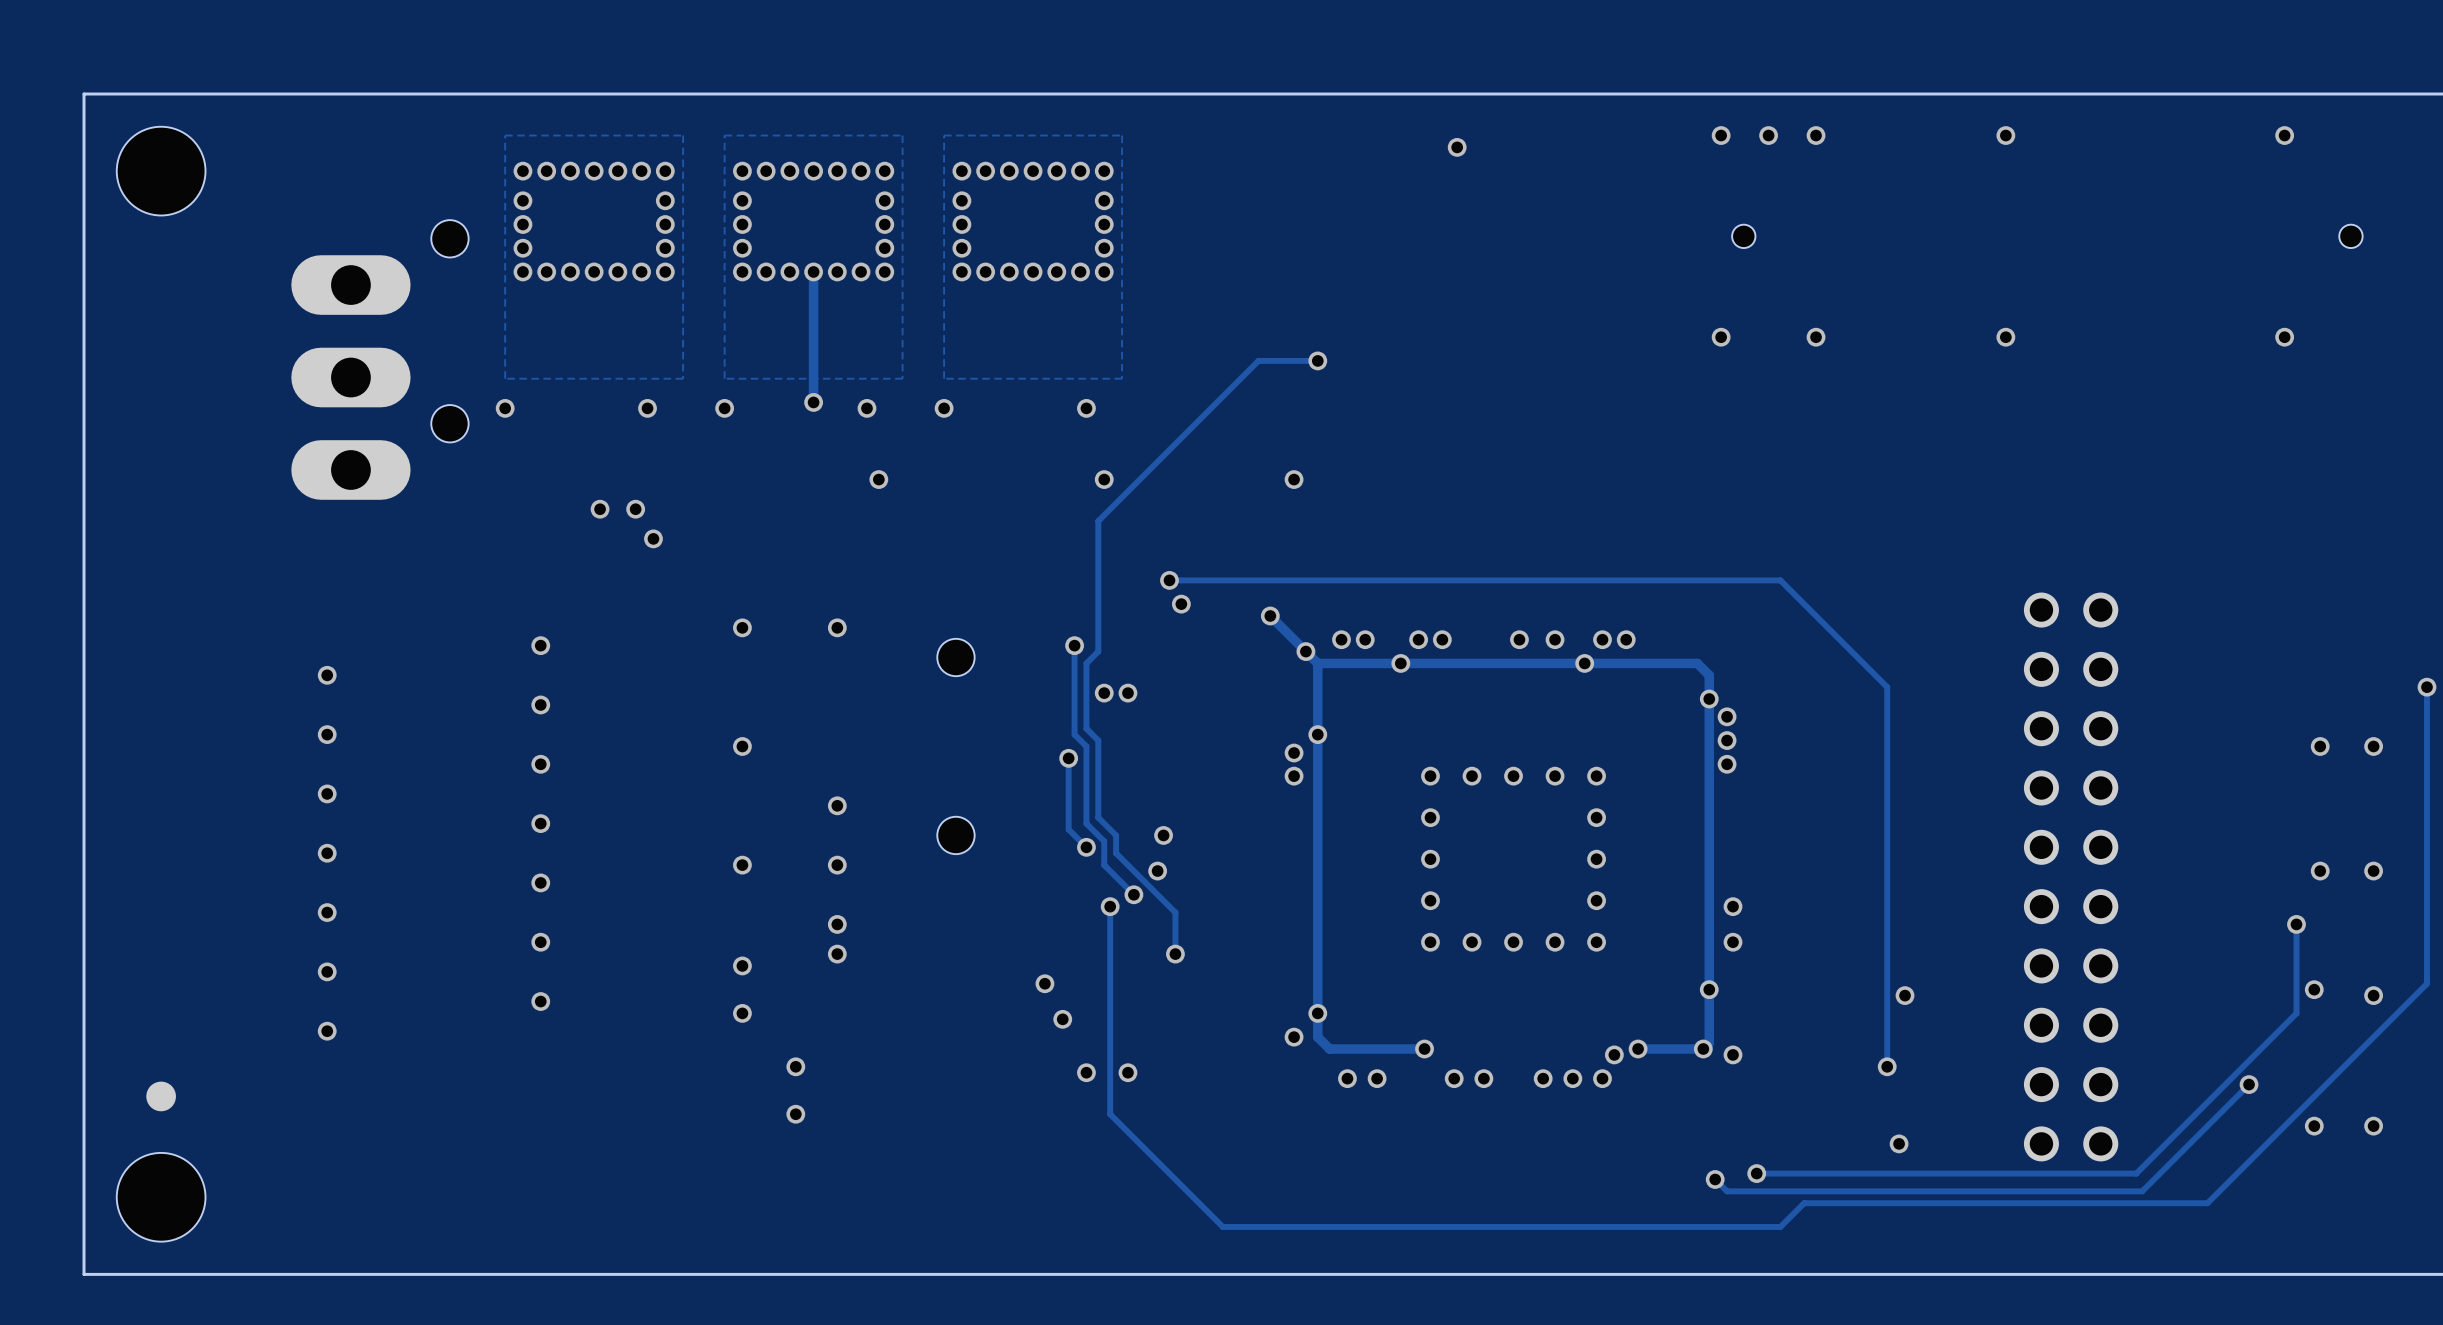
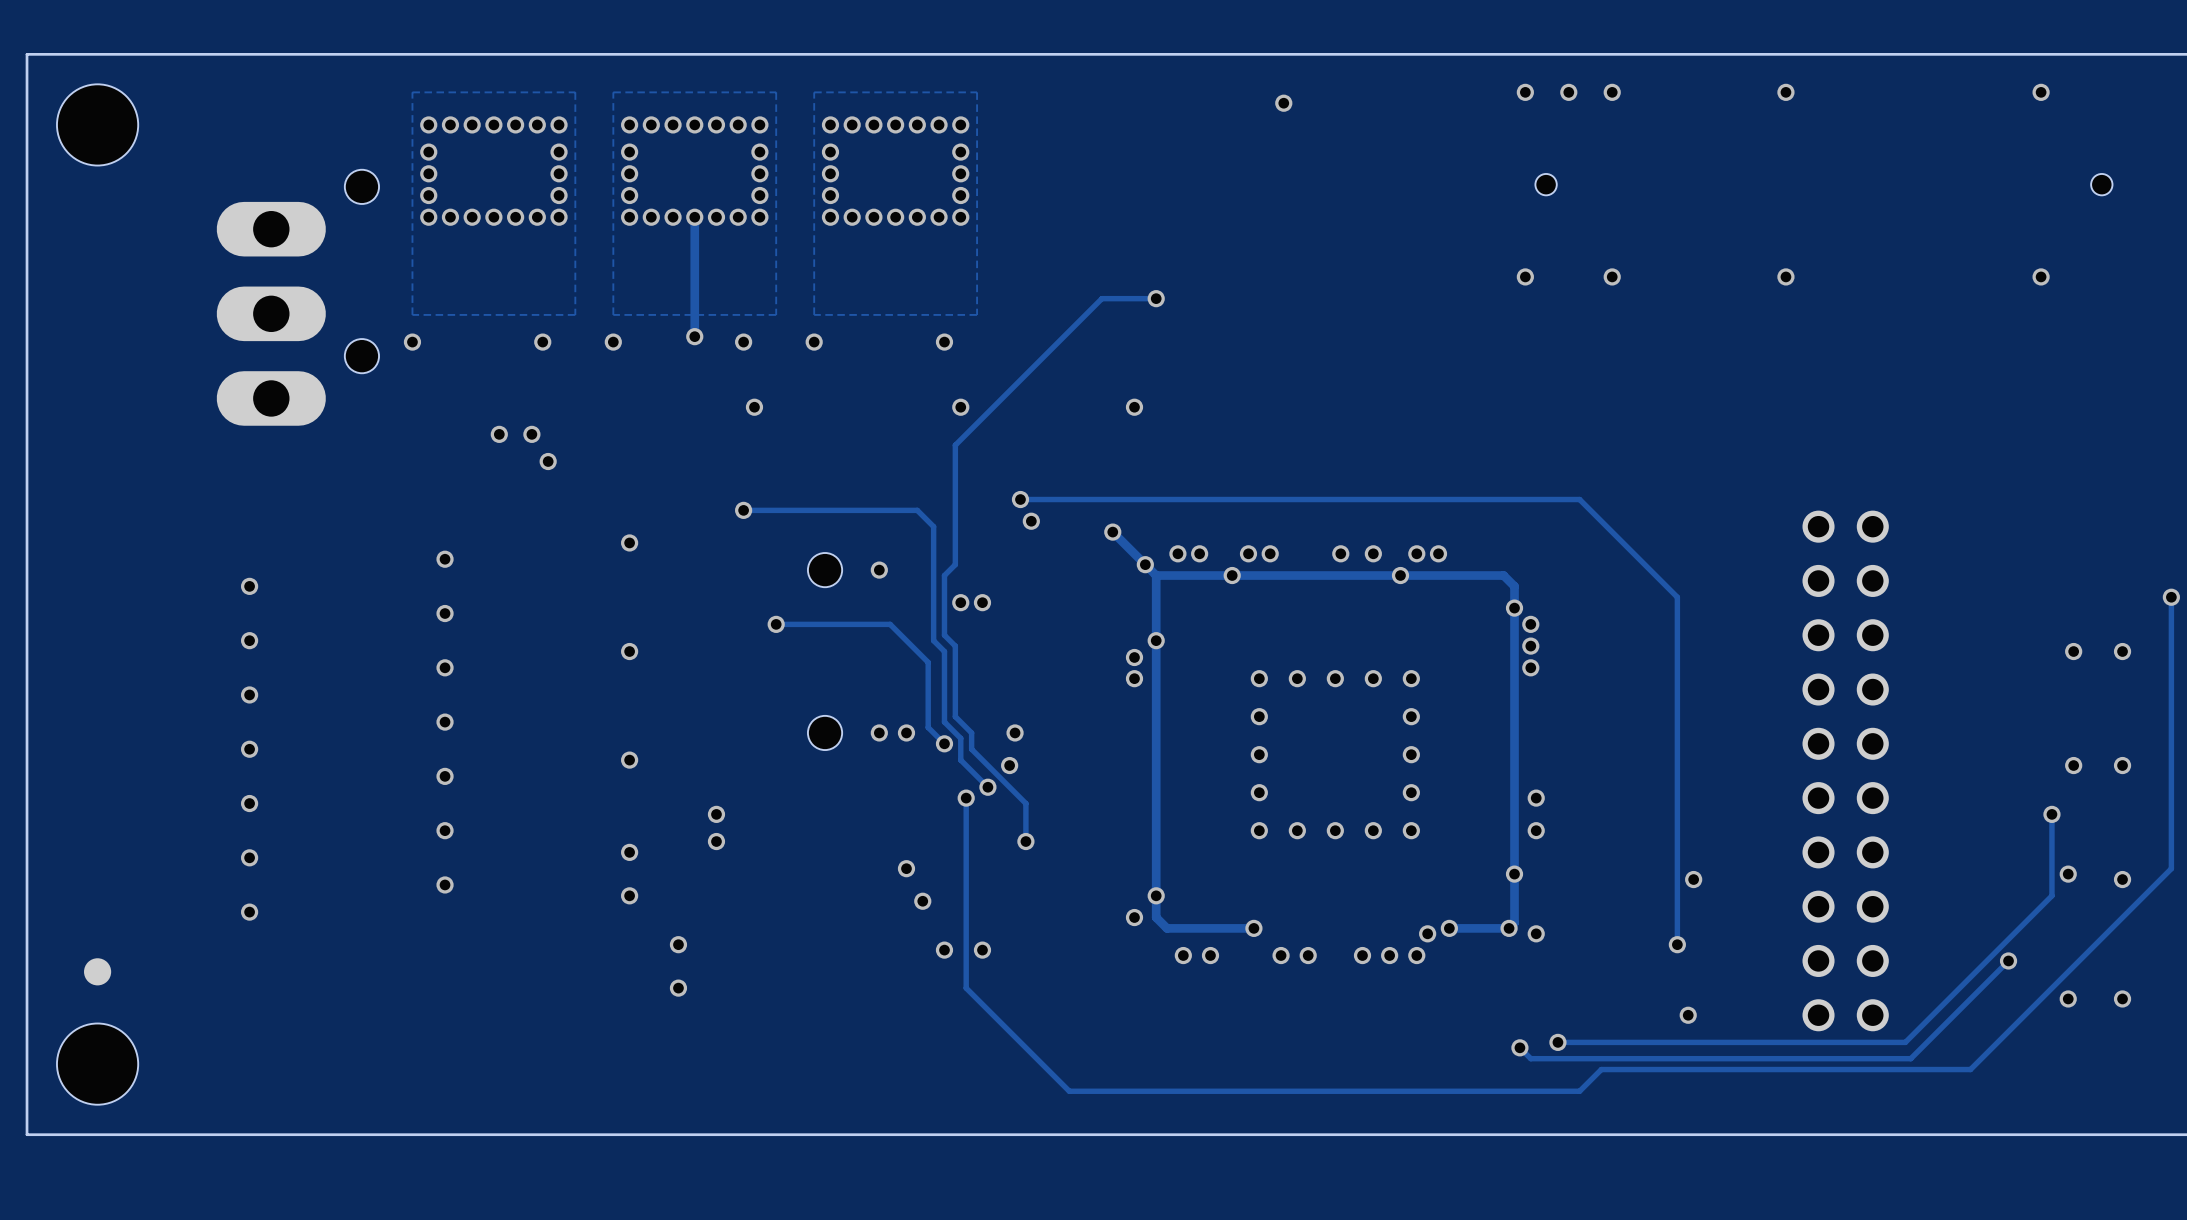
track: none -> (743, 510) (917, 510) (933, 526) (933, 559)
via position: (837, 627) -> (743, 510)
via: (1074, 645) -> none
via: none -> (879, 570)
track: none -> (776, 624) (890, 624) (928, 662)
via: none -> (776, 624)
via: (1068, 758) -> none
via: (837, 805) -> none
via: none -> (879, 732)
via: none -> (906, 732)
via: (837, 865) -> none

